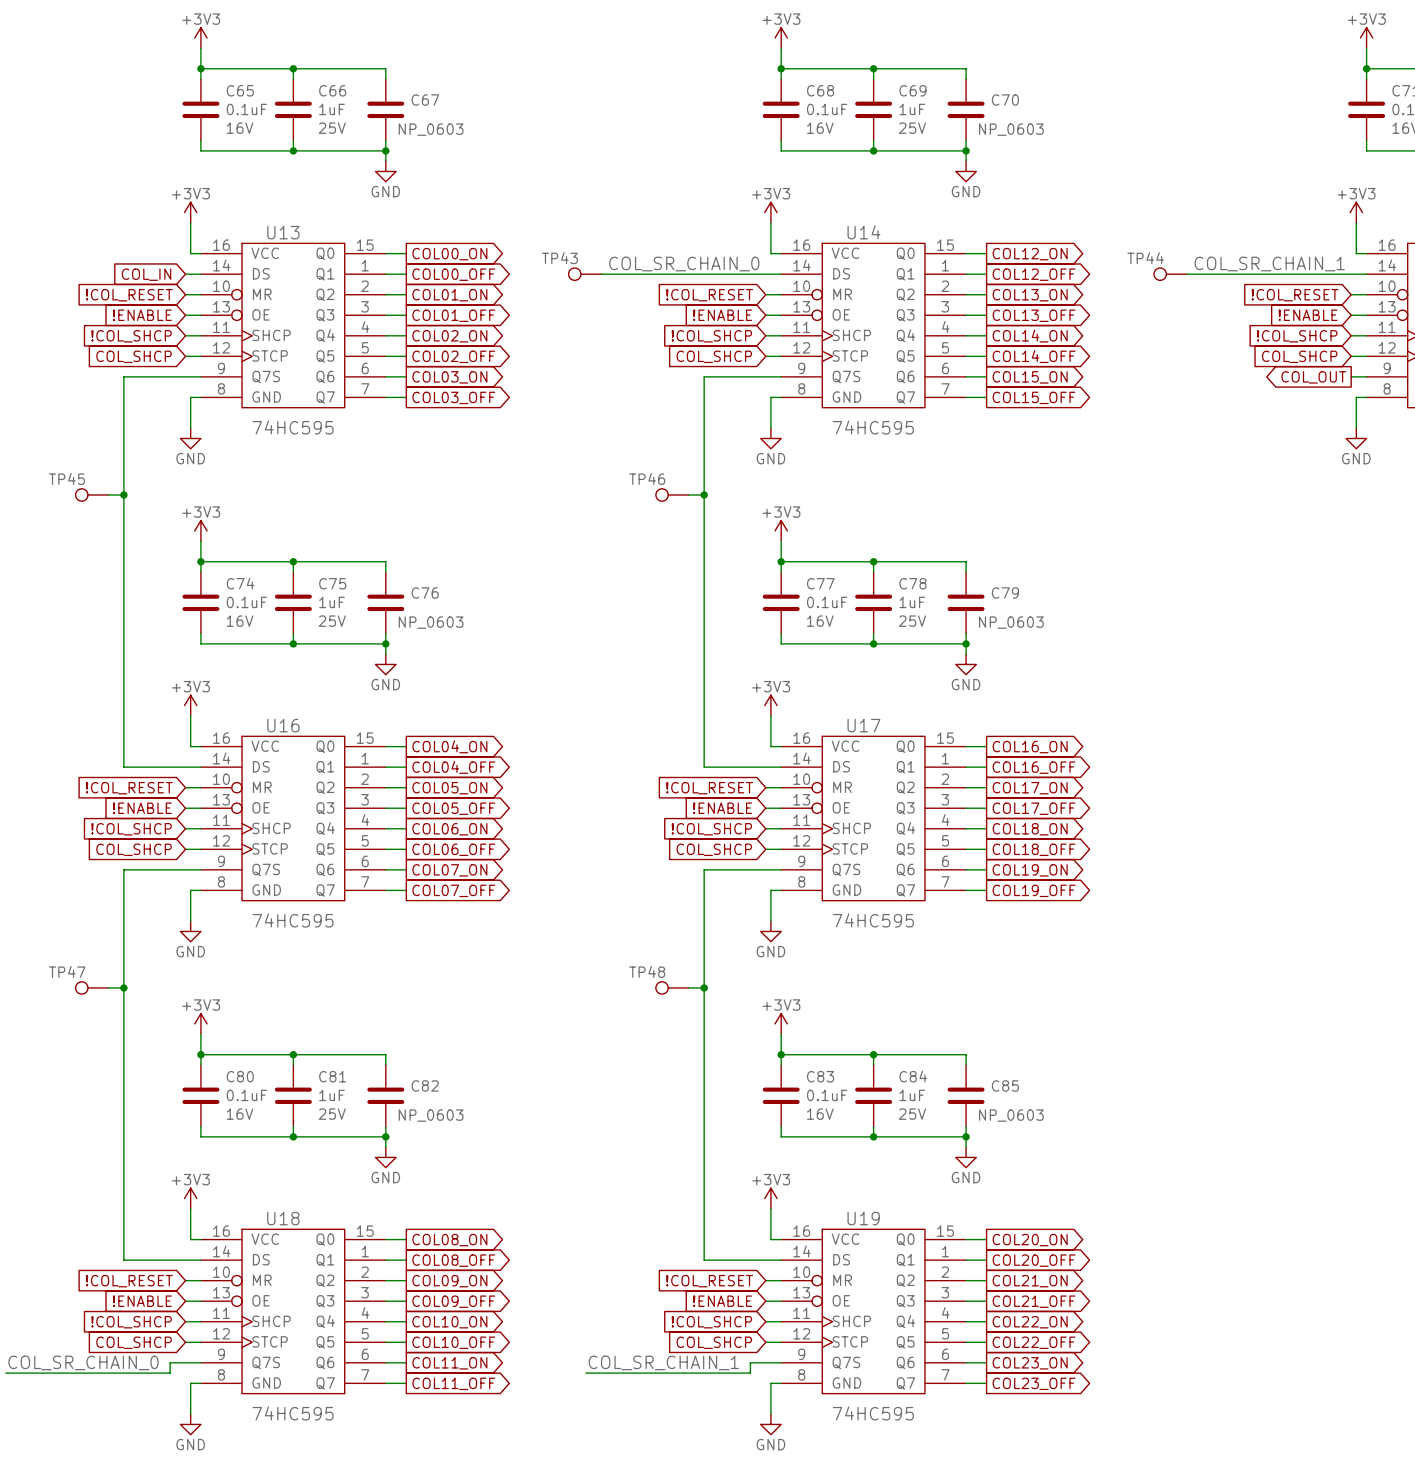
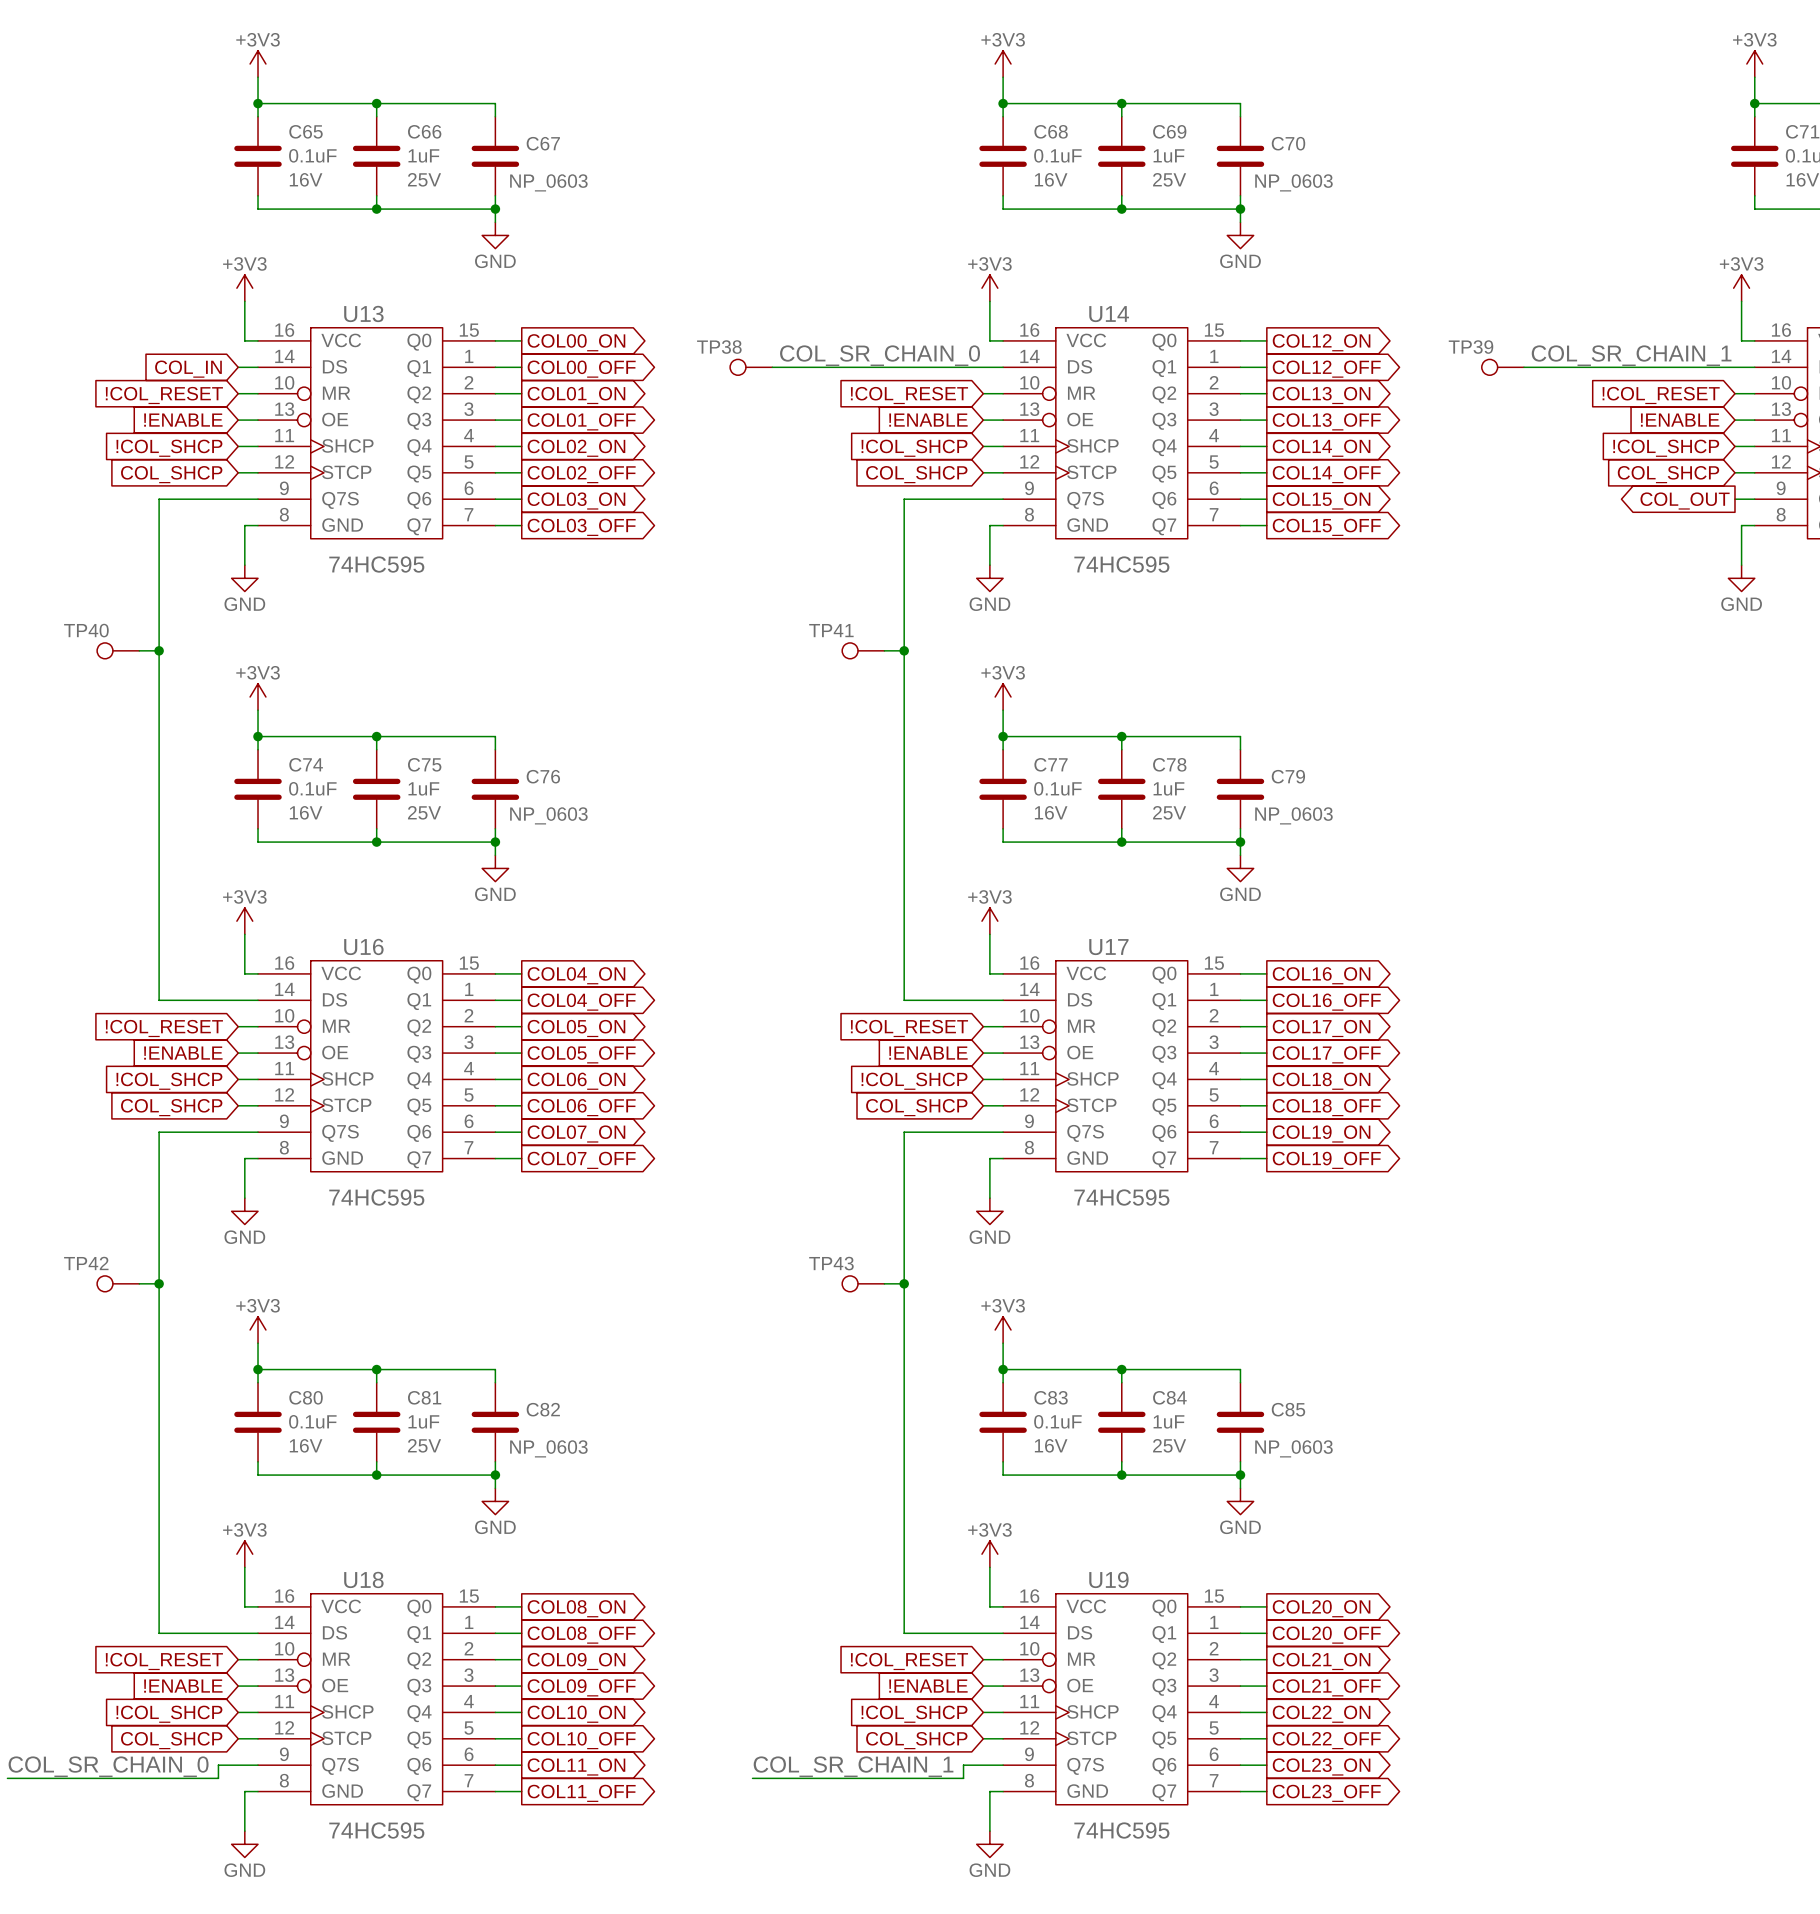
TP43 name: TP43 (559, 258) -> TP38 (719, 347)
TP44 name: TP44 (1145, 258) -> TP39 (1471, 347)
TP45 name: TP45 (66, 478) -> TP40 (86, 630)
TP46 name: TP46 (647, 478) -> TP41 (831, 630)
TP47 name: TP47 (67, 971) -> TP42 (86, 1263)
TP48 name: TP48 (647, 971) -> TP43 (831, 1263)

